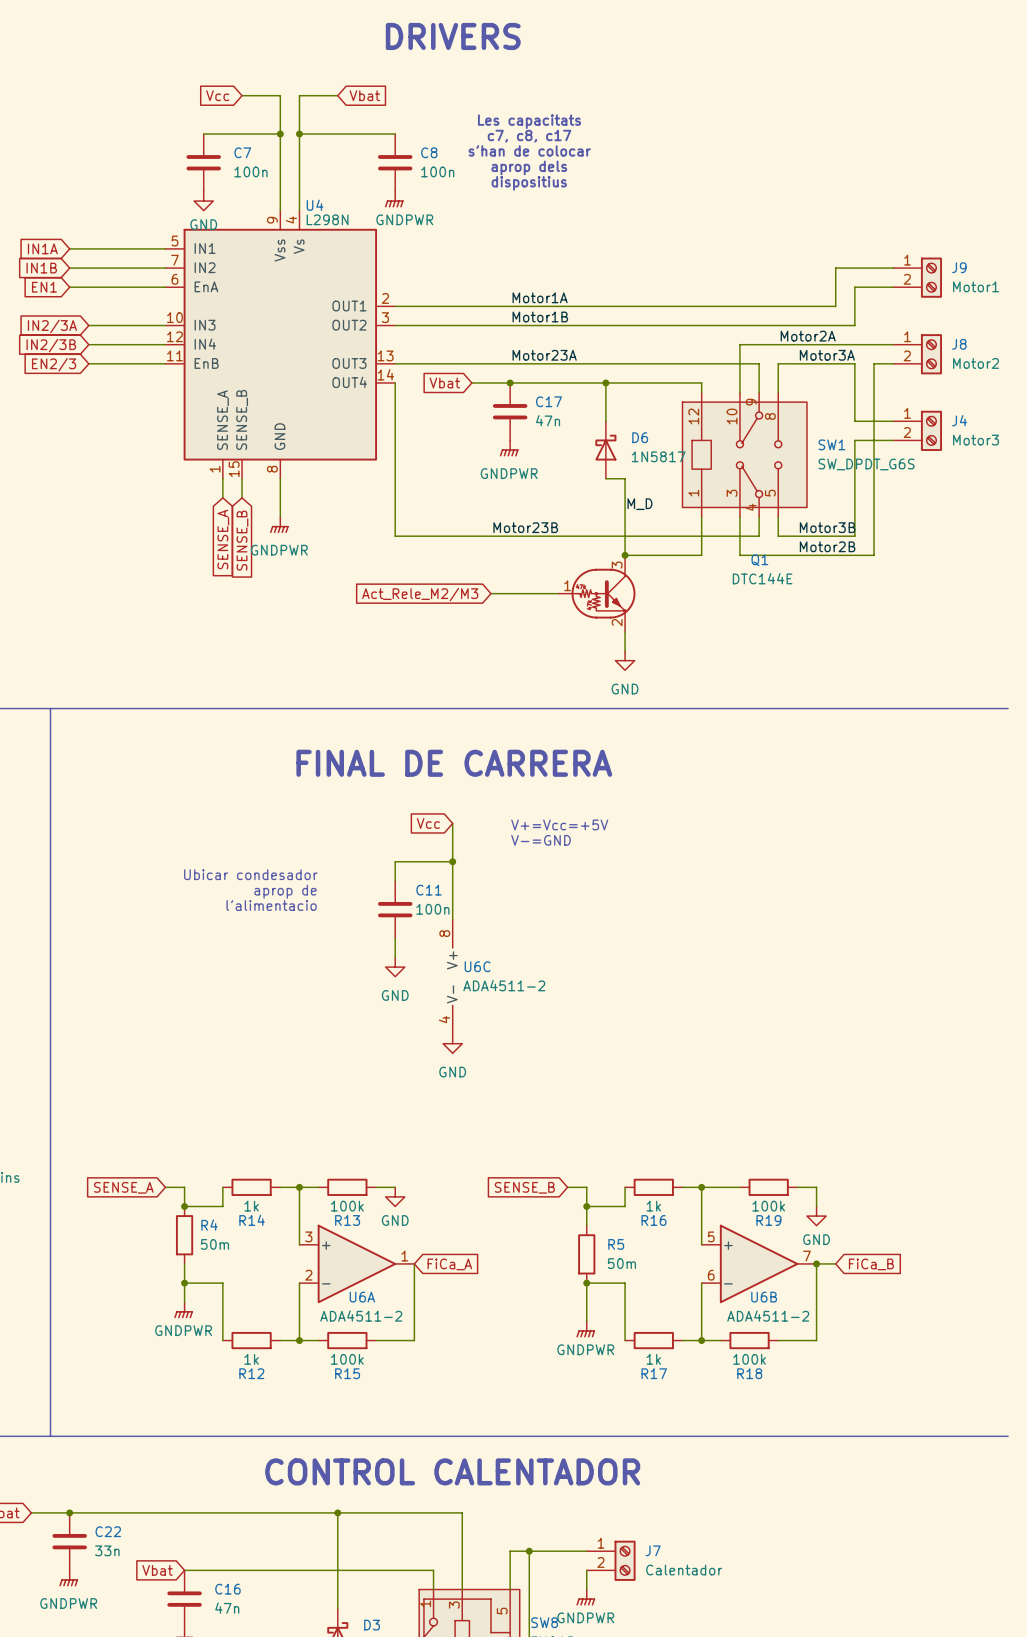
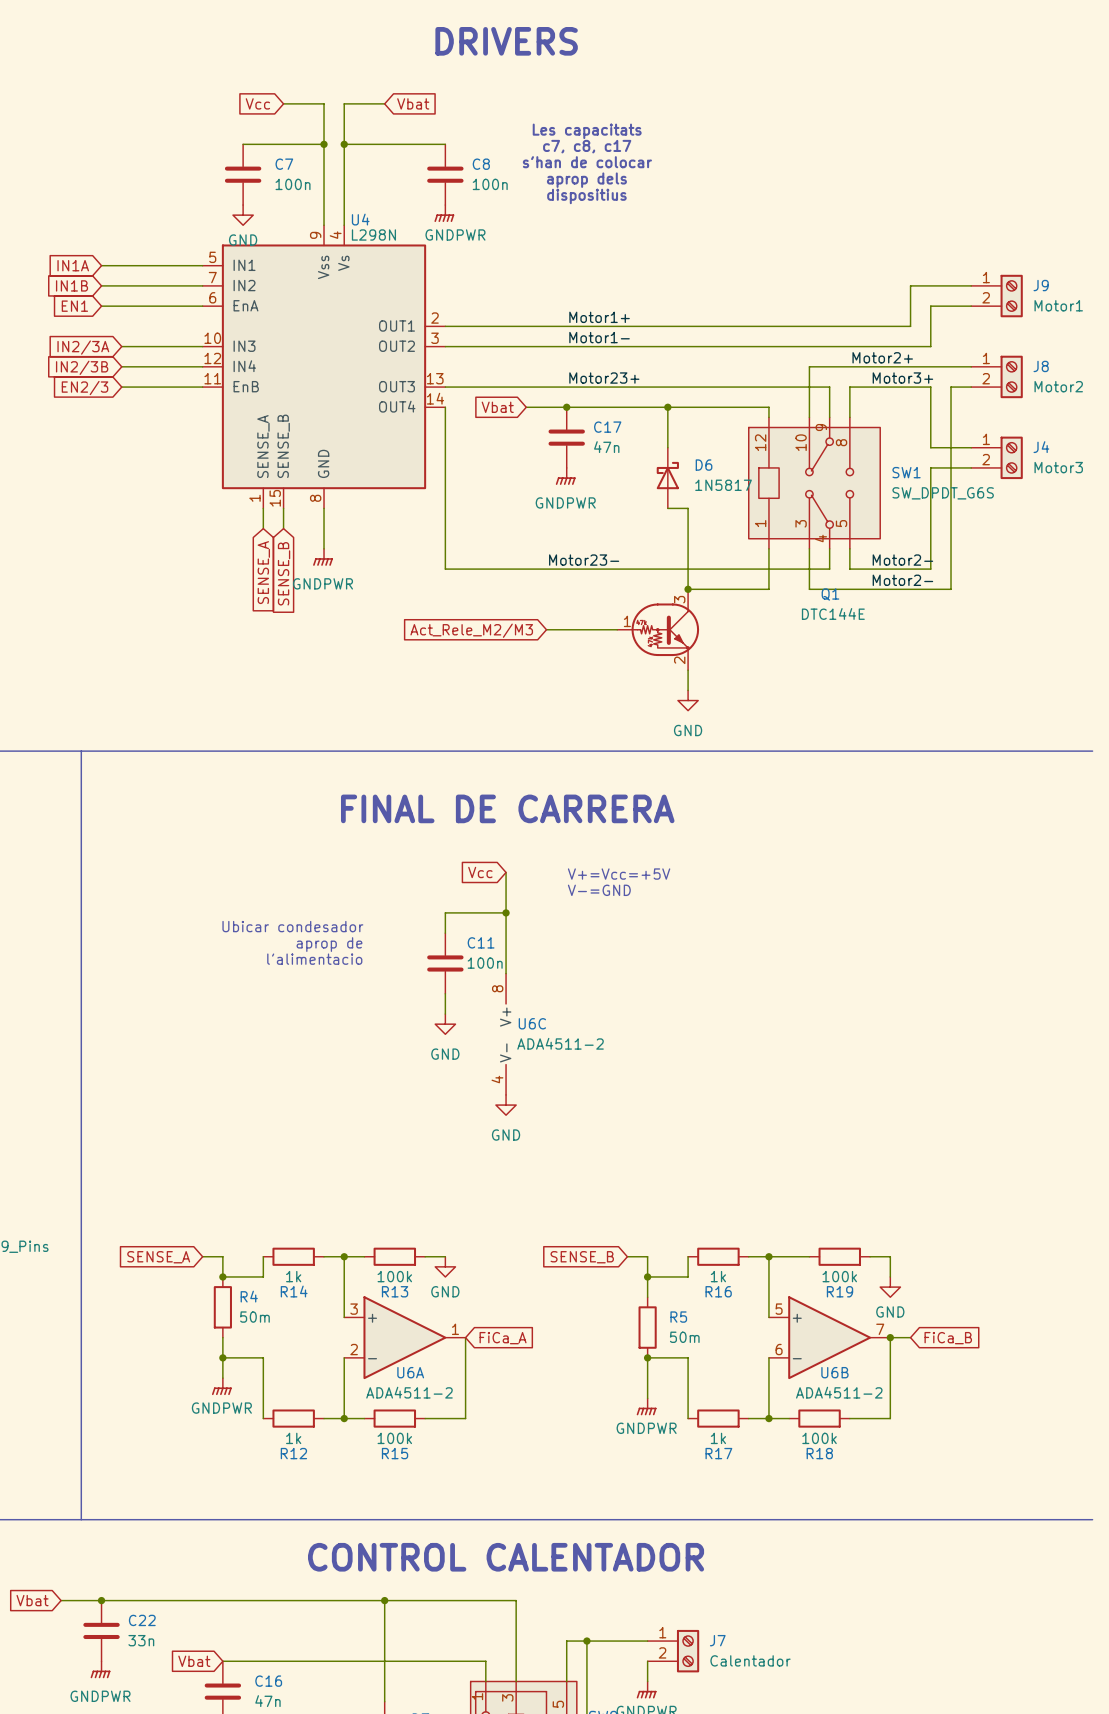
label: Motor1A (540, 297) -> Motor1+ (599, 317)
label: Motor1B (540, 316) -> Motor1- (599, 337)
label: Motor2A (808, 336) -> Motor2+ (882, 357)
label: Motor23A (544, 355) -> Motor23+ (604, 378)
label: Motor3A (827, 355) -> Motor3+ (902, 378)
label: M_D (639, 504) -> none
label: Motor23B (525, 527) -> Motor23- (584, 560)
label: Motor3B (827, 527) -> Motor2- (902, 560)
label: Motor2B (827, 546) -> Motor2- (902, 580)

